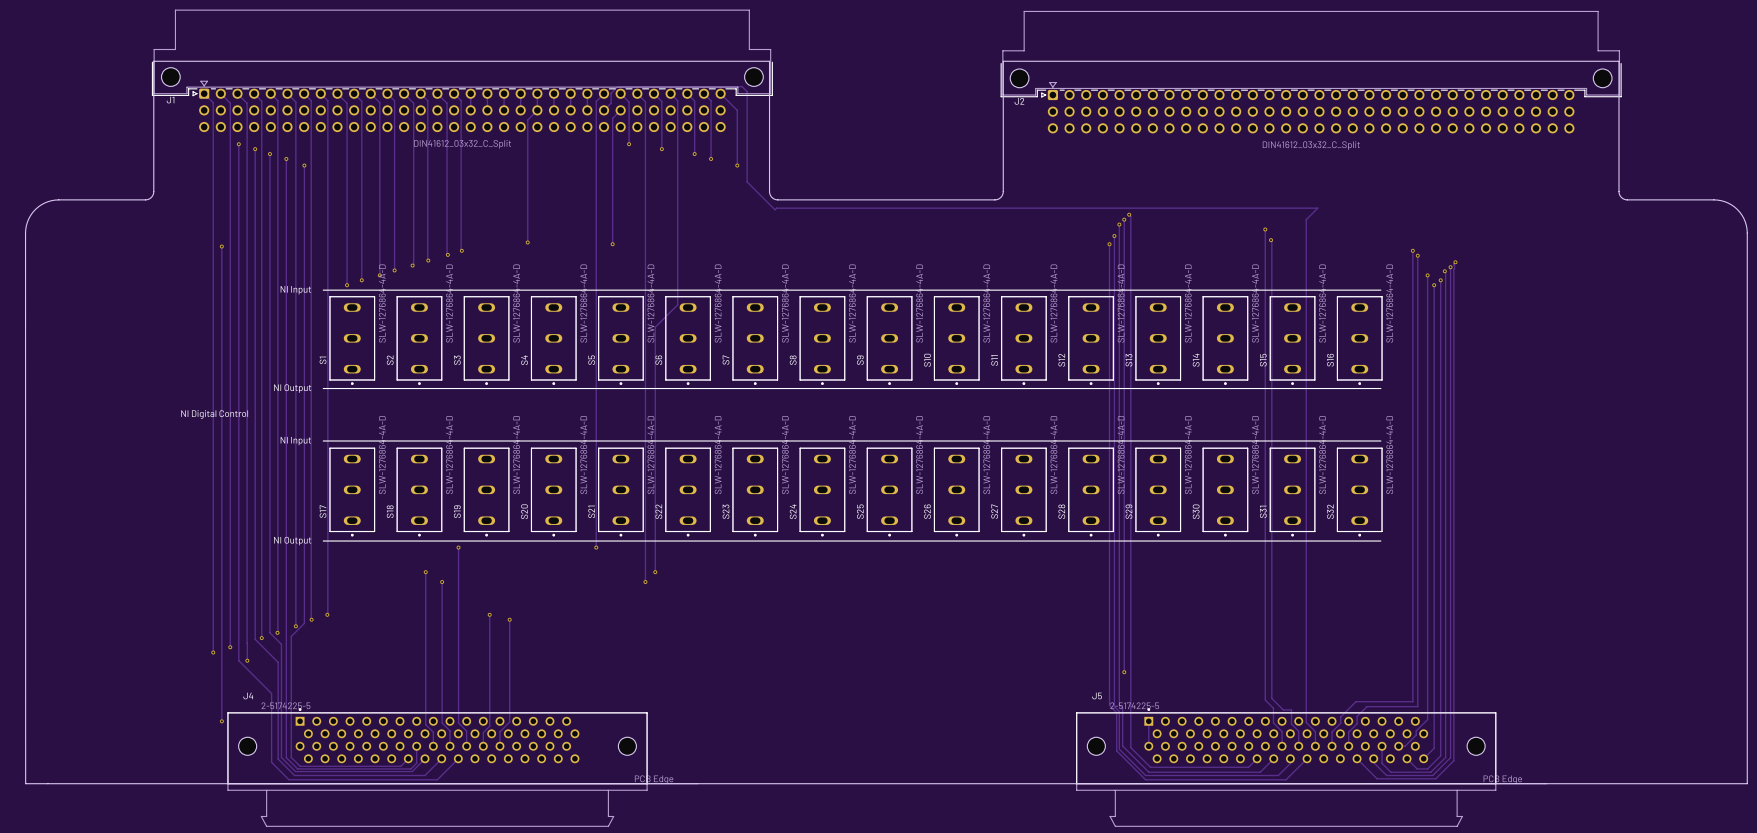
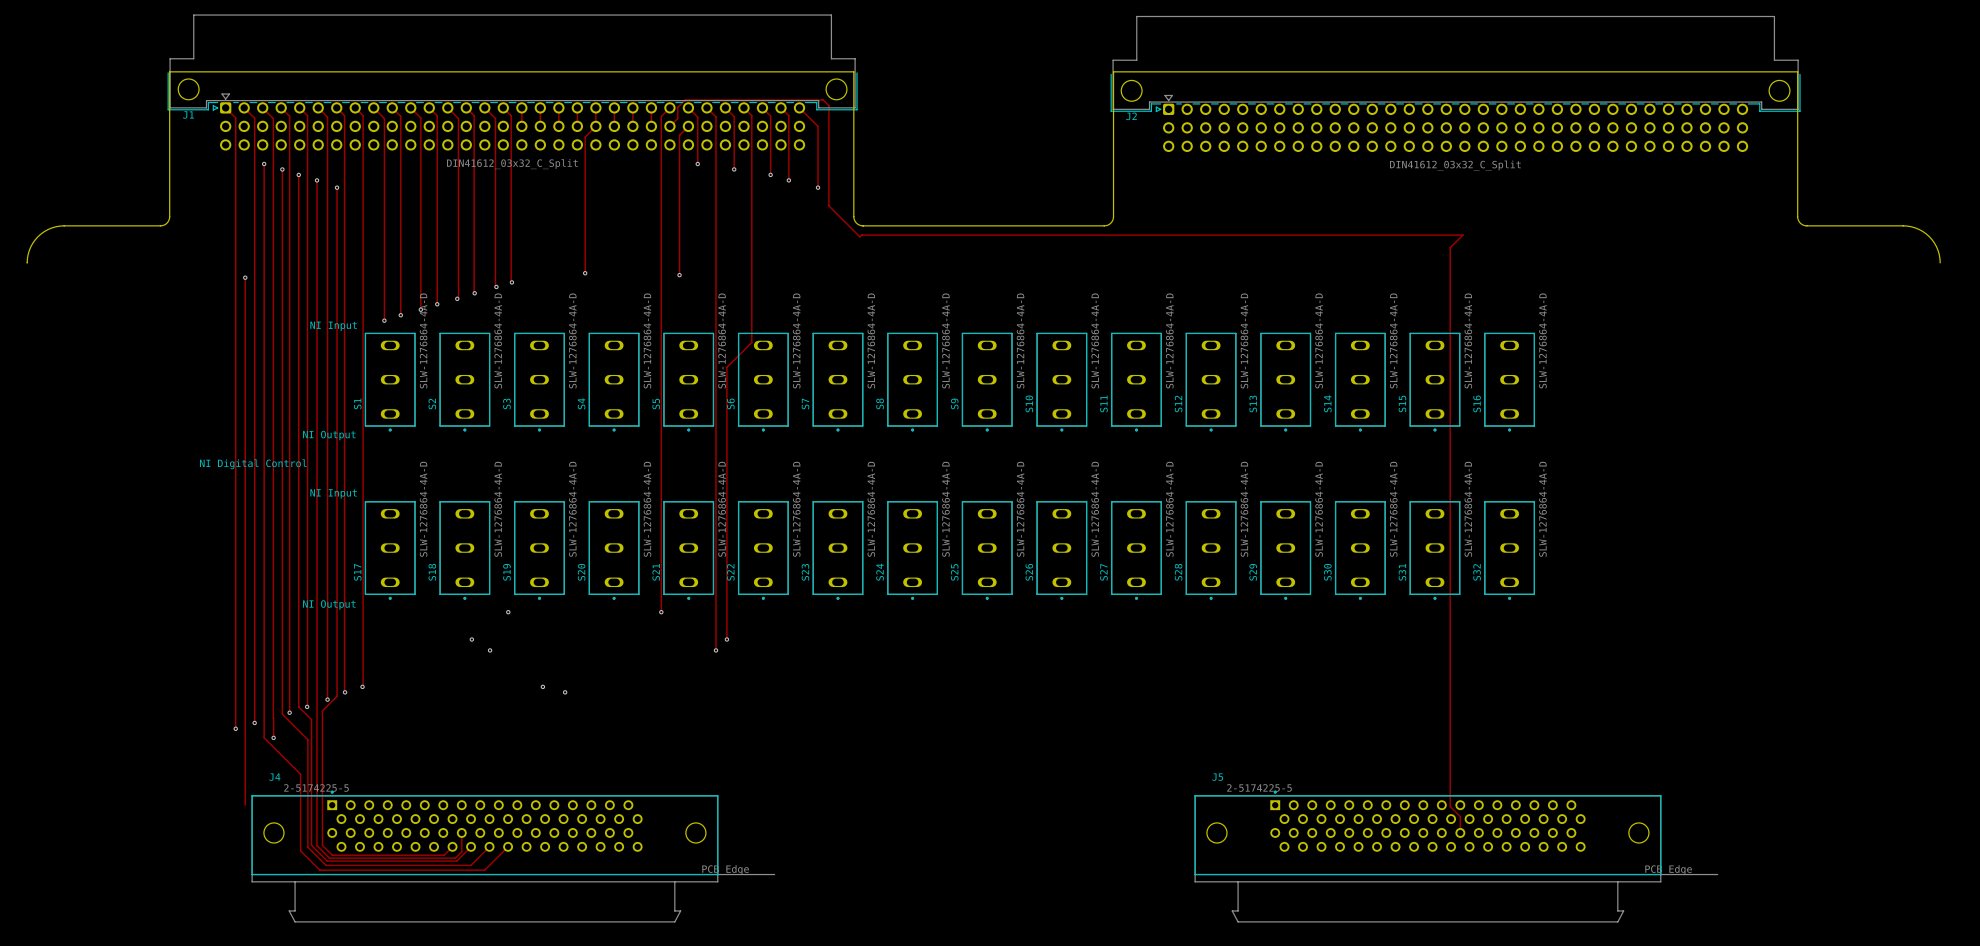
track: (1129, 214) (1130, 216) (1130, 747) (1150, 767) (1248, 767) (1257, 758) -> none
via: (1129, 214) -> none
track: (1124, 219) (1124, 672) -> none
via: (1124, 219) -> none
track: (1119, 224) (1119, 704) (1122, 708) (1122, 745) (1148, 772) (1260, 772) (1273, 758) -> none
via: (1119, 224) -> none
track: (1265, 229) (1265, 700) (1273, 708) (1273, 723) (1282, 731) (1282, 746) -> none
via: (1265, 229) -> none
board edge: (25, 233) (25, 783) (1747, 783) (1747, 233) -> none
track: (1114, 236) (1114, 706) (1119, 711) (1119, 749) (1145, 775) (1278, 775) (1290, 763) (1290, 758) -> none
via: (1114, 236) -> none
track: (1271, 240) (1271, 698) (1283, 709) (1291, 709) (1291, 724) (1298, 731) (1298, 746) -> none
via: (1271, 240) -> none
track: (1109, 244) (1109, 705) (1116, 712) (1116, 750) (1145, 779) (1286, 779) (1307, 758) -> none
via: (1109, 244) -> none
track: (1412, 250) (1412, 701) (1355, 701) (1340, 716) (1340, 723) (1332, 731) (1332, 746) -> none
via: (1412, 250) -> none
track: (1417, 255) (1417, 706) (1366, 706) (1357, 716) (1357, 723) (1348, 732) (1348, 746) -> none
via: (1417, 255) -> none
track: (1455, 262) (1453, 263) (1453, 760) (1435, 778) (1377, 778) (1357, 758) -> none
via: (1455, 262) -> none
track: (1450, 267) (1450, 757) (1432, 775) (1386, 775) (1373, 762) (1373, 758) -> none
via: (1450, 267) -> none
track: (1444, 271) (1445, 757) (1430, 772) (1390, 772) (1382, 763) (1382, 746) -> none
via: (1444, 271) -> none
track: (1427, 275) (1427, 719) (1404, 746) (1398, 746) -> none
via: (1427, 275) -> none
track: (1440, 280) (1440, 755) (1427, 768) (1417, 768) (1407, 758) -> none
via: (1440, 280) -> none
track: (1434, 285) (1434, 748) (1423, 758) -> none
via: (1434, 285) -> none
line: (323, 290) (1380, 290) -> none
line: (323, 388) (1380, 388) -> none
line: (323, 441) (1380, 441) -> none
line: (323, 541) (1380, 541) -> none
track: (458, 547) (458, 723) (466, 731) (466, 746) -> none
track: (425, 572) (425, 724) (433, 732) (433, 746) -> none
track: (442, 582) (442, 723) (450, 730) (450, 746) -> none
track: (489, 614) (489, 726) (483, 732) (483, 746) -> none
track: (509, 619) (509, 722) (499, 731) (499, 746) -> none
via: (1124, 672) -> none
via: (221, 721) -> none
track: (1148, 721) (1148, 746) -> none

